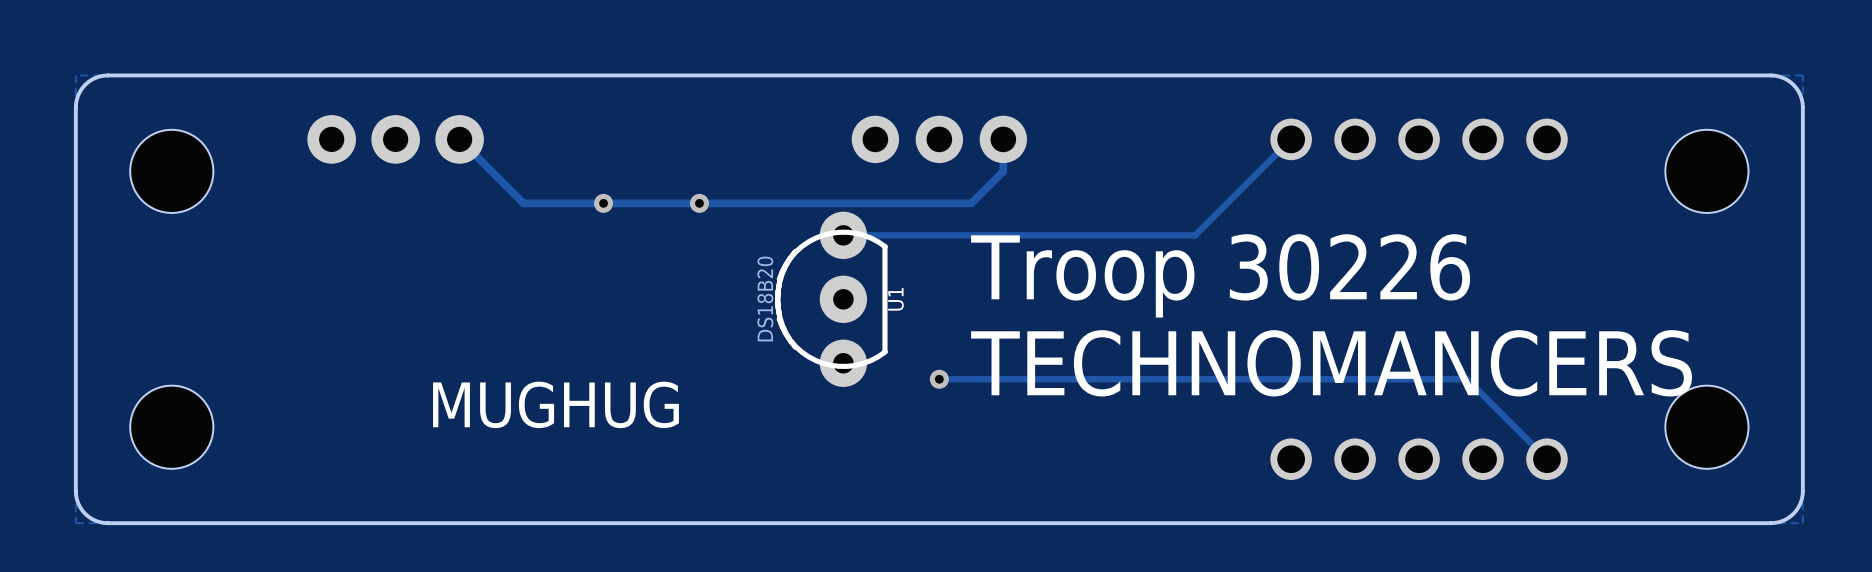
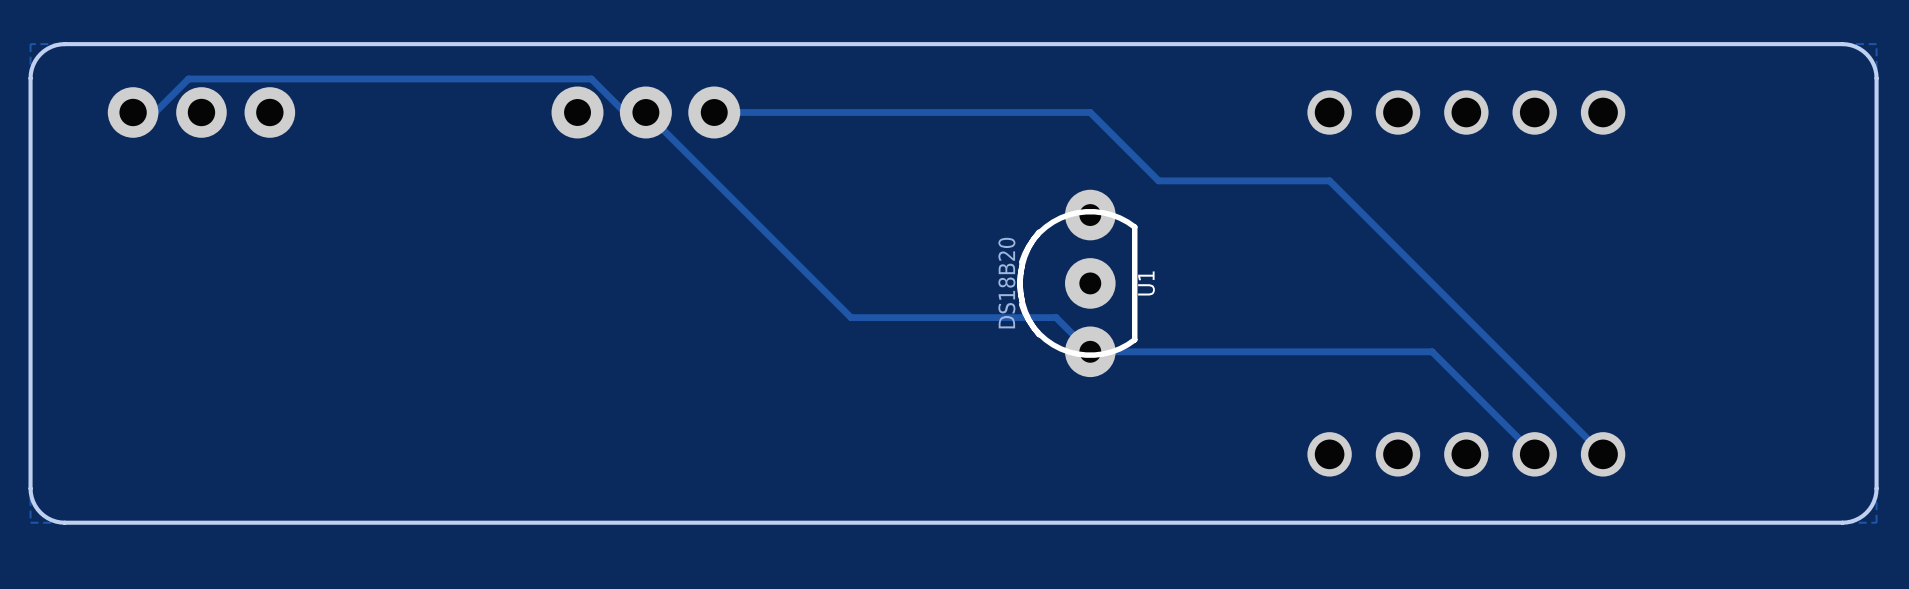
track: none -> (133, 112) (155, 112) (188, 78) (591, 78) (624, 112) (645, 112) (851, 317) (1056, 317) (1090, 351) (1432, 351) (1534, 454)
part: none -> (201, 112)
part position: (395, 139) -> (645, 112)
part: (939, 139) -> none
track: (1003, 139) (1003, 171) (971, 203) (523, 203) (459, 139) -> none
track: (1291, 139) (1195, 235) (843, 235) -> none
part: (171, 171) -> none
part: (1706, 171) -> none
via: (603, 203) -> none
via: (699, 203) -> none
text: Troop 30226 (1220, 275) -> none
U1 position: (831, 299) -> (1077, 283)
text: TECHNOMANCERS (1331, 363) -> none
via: (939, 379) -> none
track: (1467, 379) (939, 379) -> (1517, 368) (1329, 180) (1158, 180) (1090, 112) (714, 112)
text: MUGHUG (555, 404) -> none
part: (171, 427) -> none
part: (1706, 427) -> none

